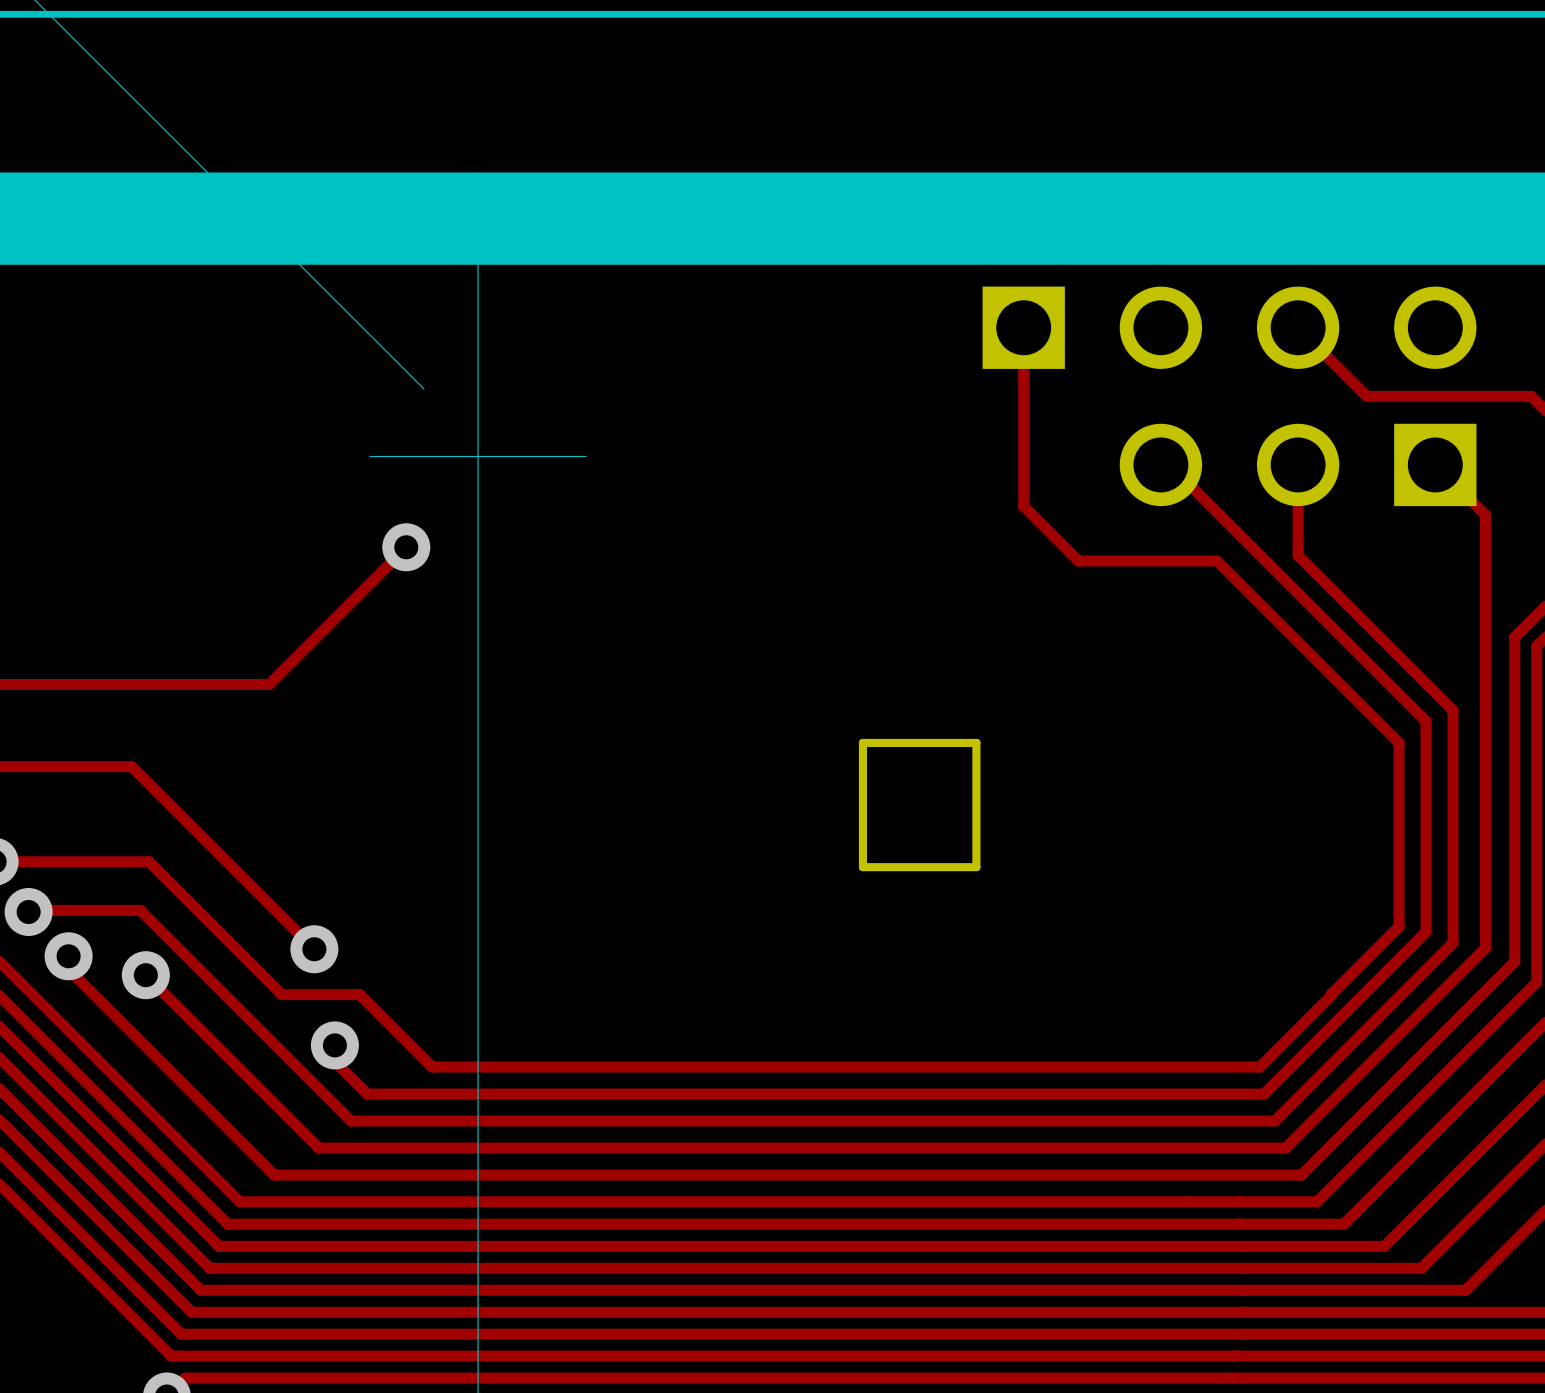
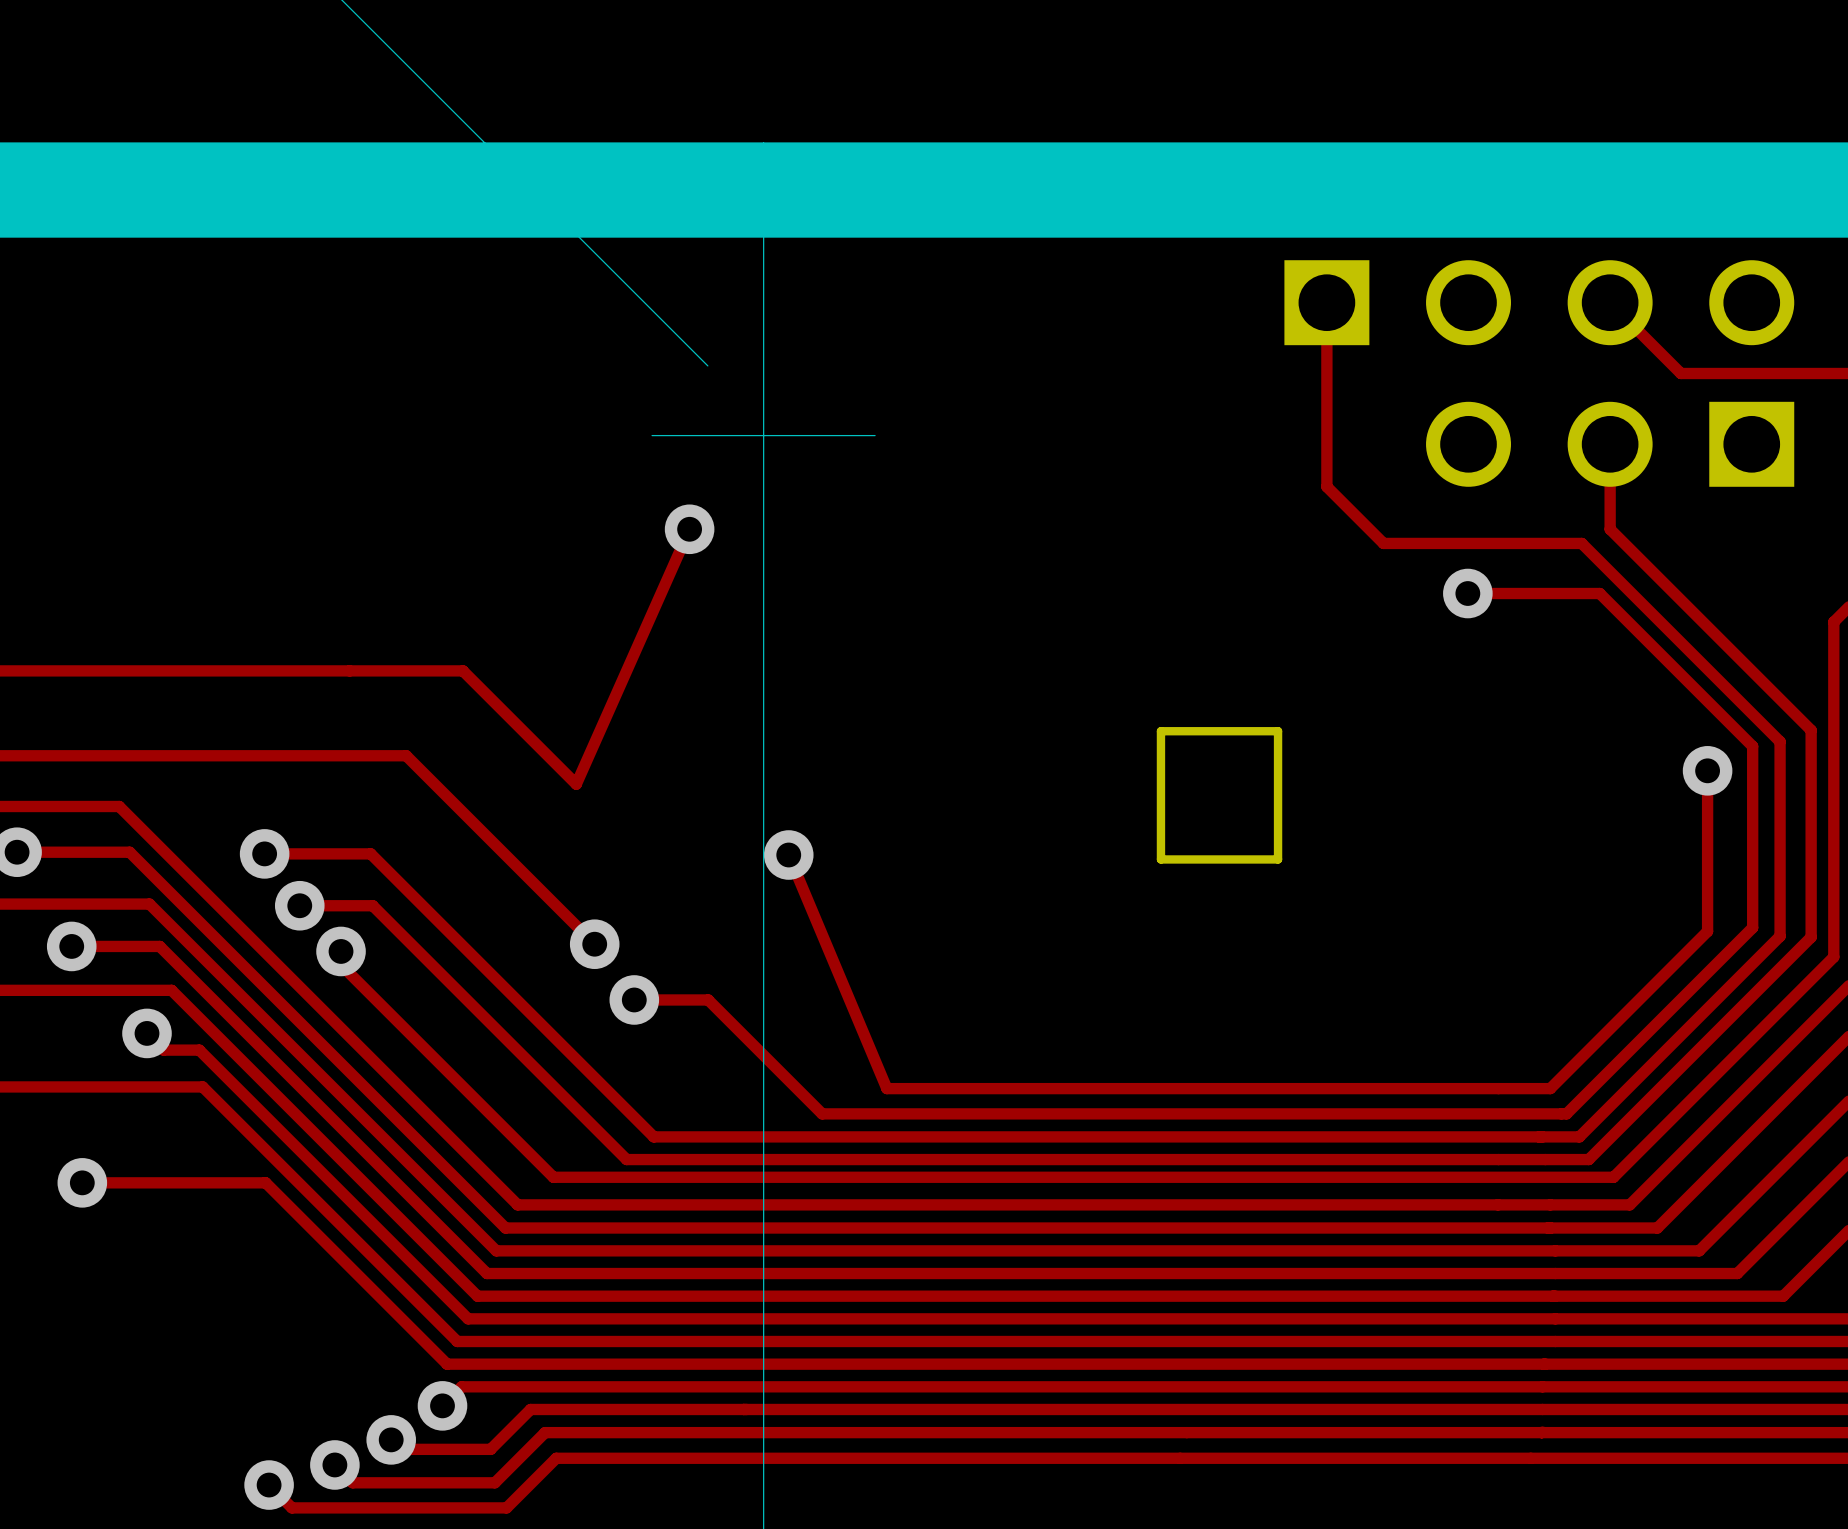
track: (1435, 464) (1485, 515) (1485, 948) (1285, 1148) (318, 1148) (145, 975) -> none
track: (1177, 472) (1426, 721) (1426, 931) (1263, 1094) (367, 1094) (334, 1061) (334, 1045) -> none
track: (406, 547) (269, 684) (186, 684) -> (689, 529) (576, 784) (463, 670)
track: (1298, 547) (1298, 555) (1453, 710) (1453, 942) (1274, 1121) (351, 1121) (140, 910) (30, 910) (28, 911) -> (1610, 529) (1811, 730) (1811, 937) (1588, 1159) (626, 1159) (372, 905) (299, 905)
track: (1217, 560) (1399, 742) (1399, 926) (1330, 994) -> none
track: none -> (1467, 593) (1599, 593) (1752, 746) (1752, 927) (1566, 1113) (822, 1113) (708, 999) (634, 999)
via: none -> (1467, 593)
track: none -> (1707, 770) (1707, 931) (1550, 1088) (886, 1088) (788, 855)
via: none -> (1707, 770)
track: (97, 861) (149, 861) (281, 994) (359, 994) (432, 1067) (1259, 1067) (1331, 993) -> (370, 853) (653, 1136) (1579, 1136) (1780, 936) (1780, 741) (1581, 543) (1526, 543)
via: none -> (788, 855)
via: (145, 975) -> none
via position: (334, 1045) -> (634, 999)

